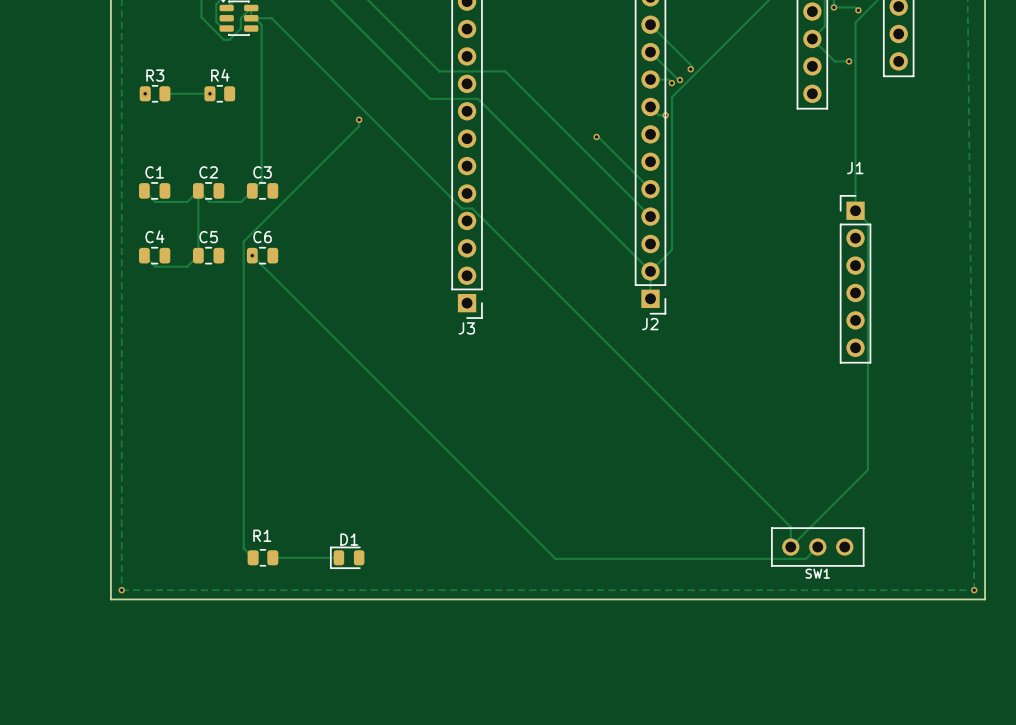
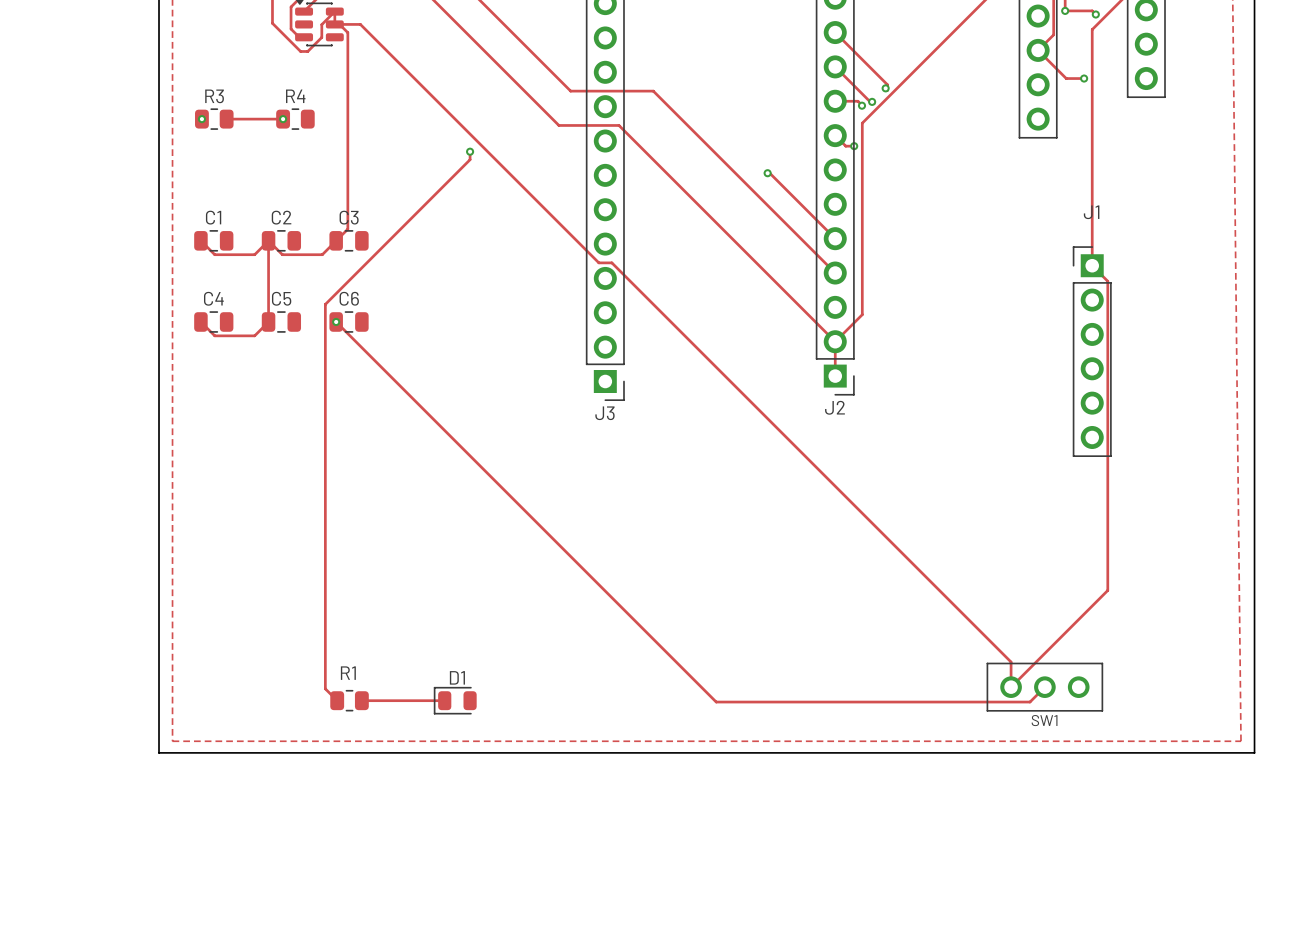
via: (121, 590) -> none
via: (974, 590) -> none

